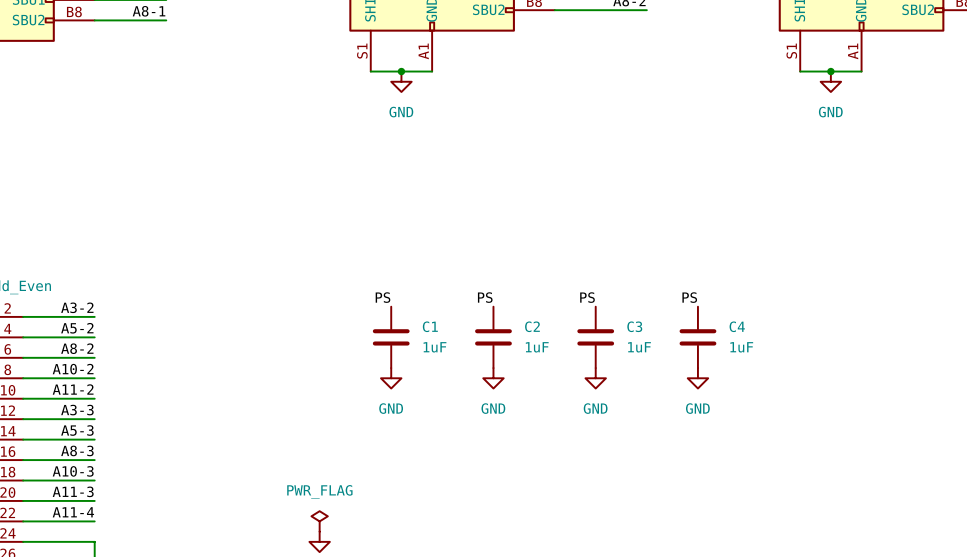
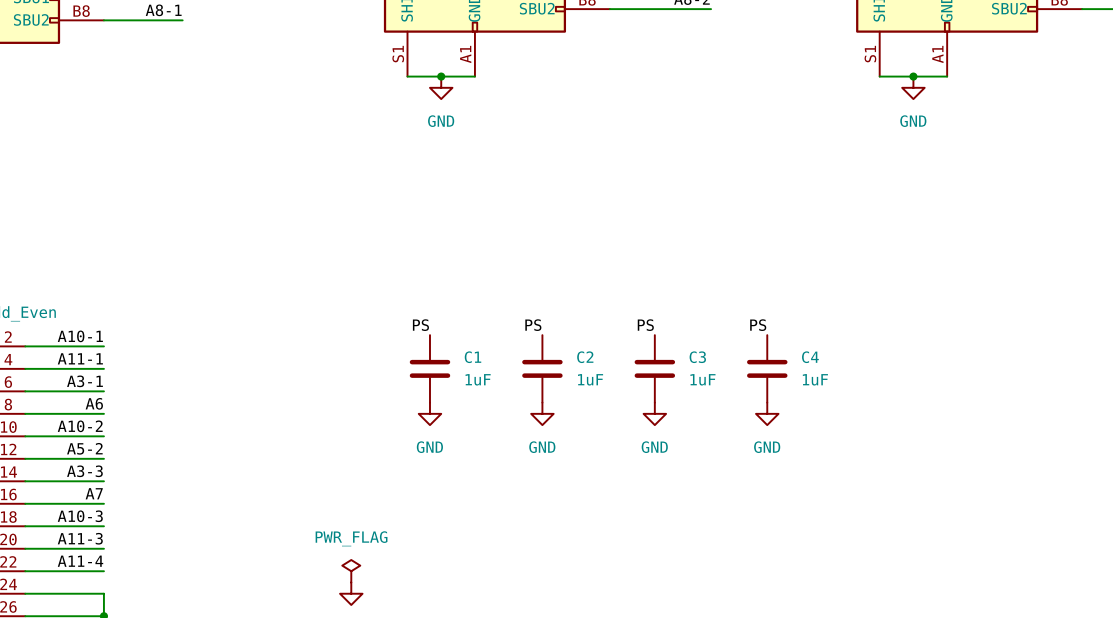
label: A3-2 (77, 307) -> A10-1 (80, 336)
label: A5-2 (77, 328) -> A11-1 (80, 358)
label: A8-2 (77, 348) -> A3-1 (85, 381)
label: A10-2 (73, 369) -> A6 (94, 403)
label: A11-2 (73, 389) -> A10-2 (80, 426)
label: A3-3 (77, 410) -> A5-2 (84, 448)
label: A5-3 (77, 430) -> A3-3 (84, 471)
label: A8-3 (77, 450) -> A7 (94, 493)

